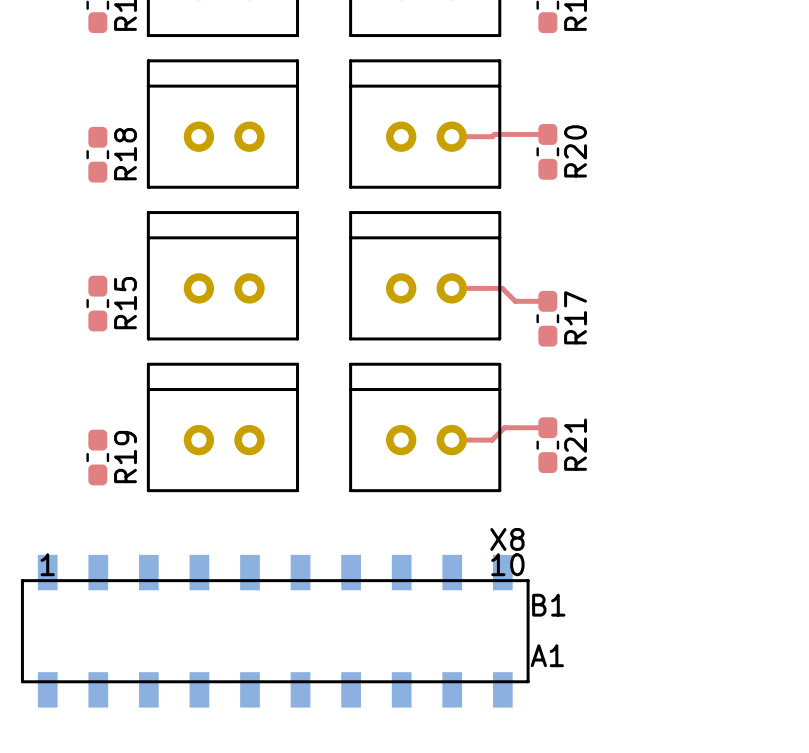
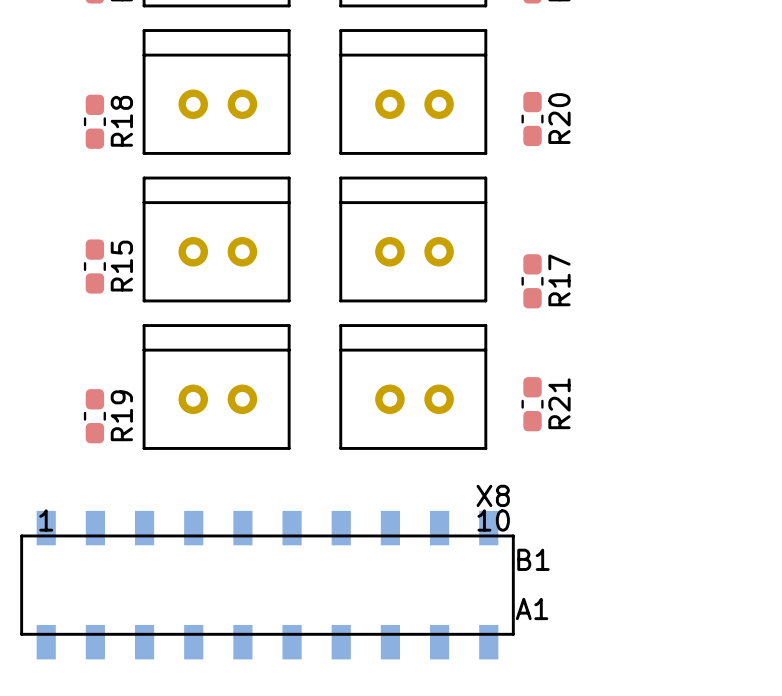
top track: (547, 134) (451, 136) -> none
top track: (451, 288) (502, 288) (515, 301) (547, 301) -> none
top track: (547, 427) (504, 427) (492, 440) (451, 440) -> none

